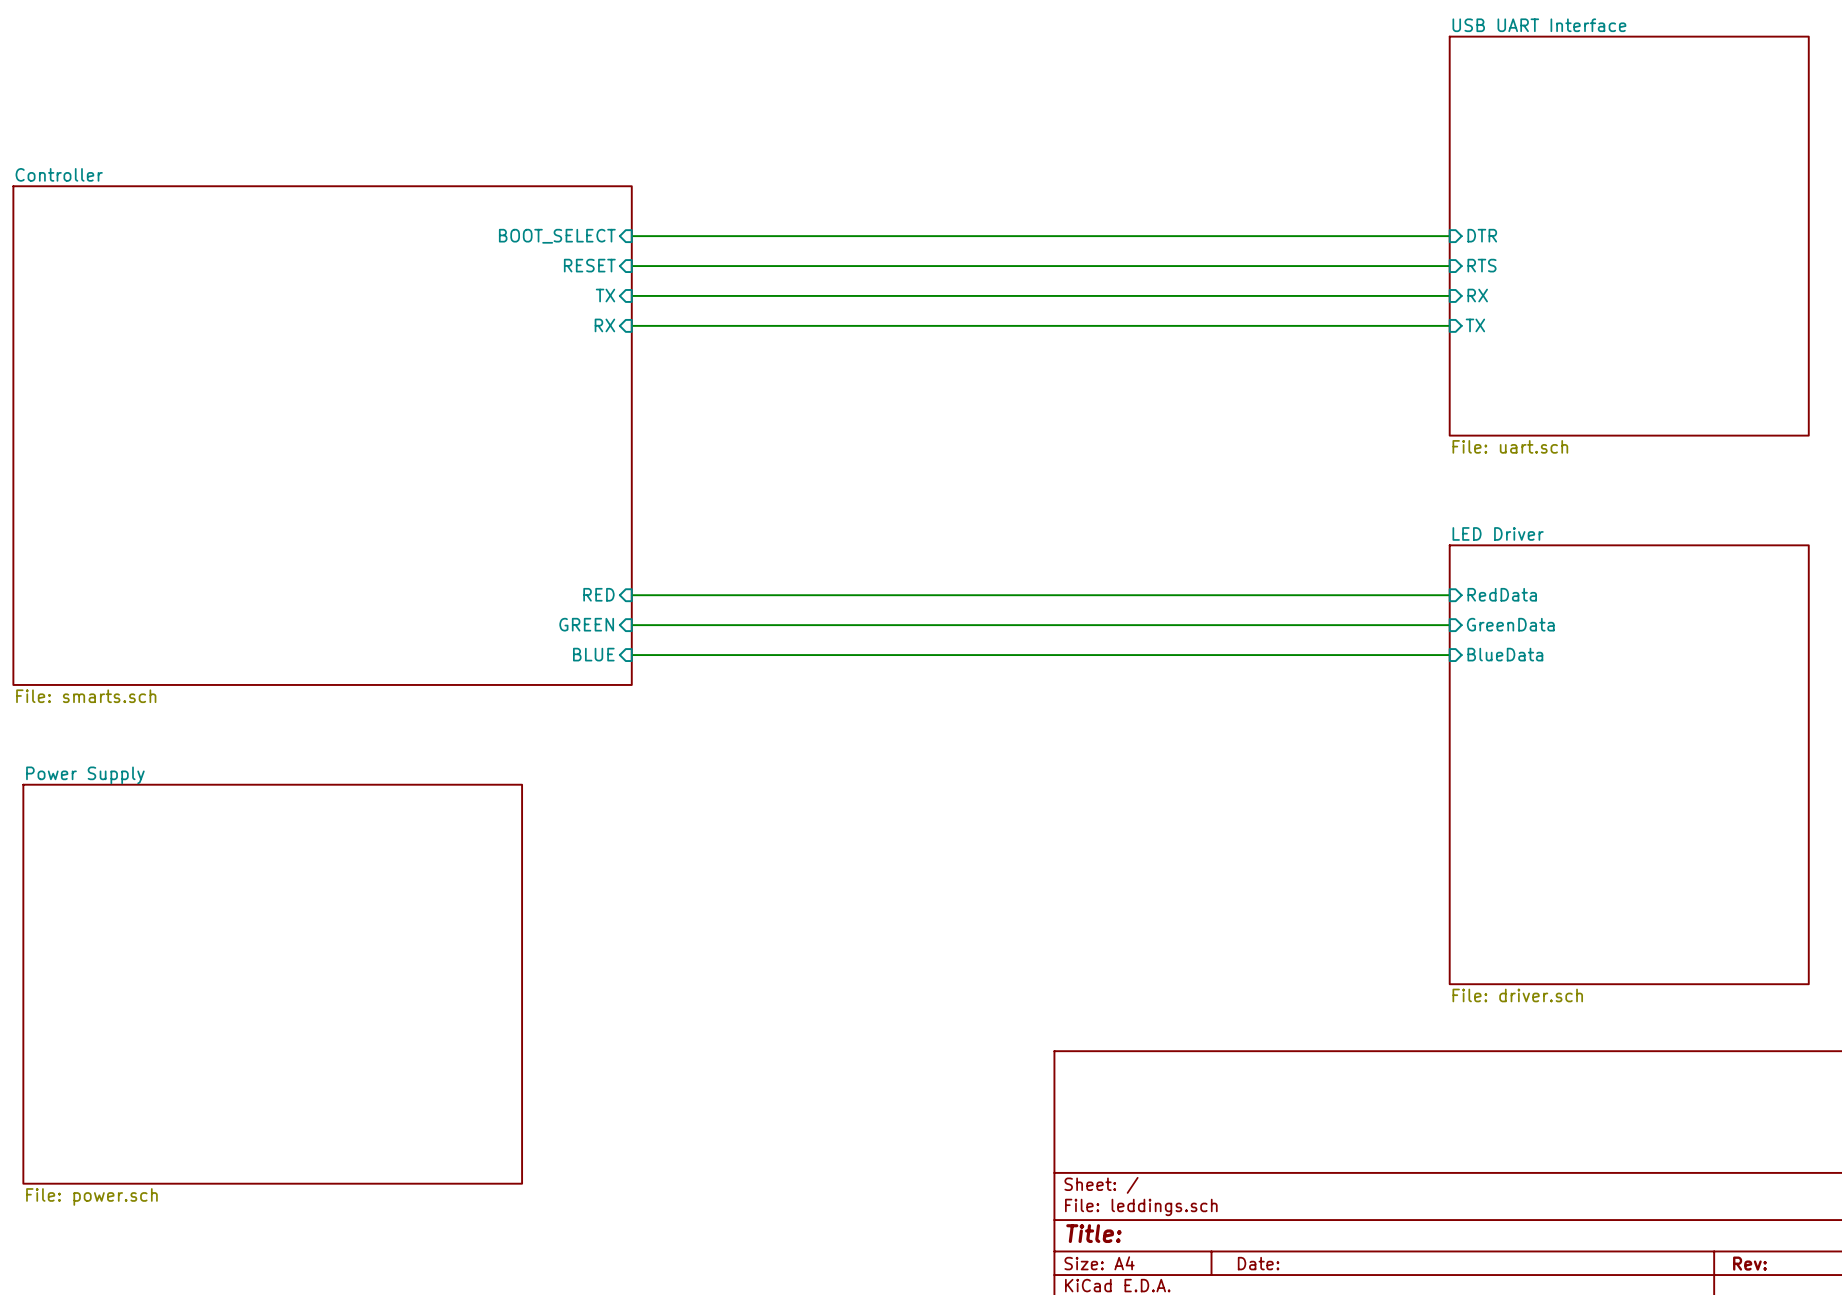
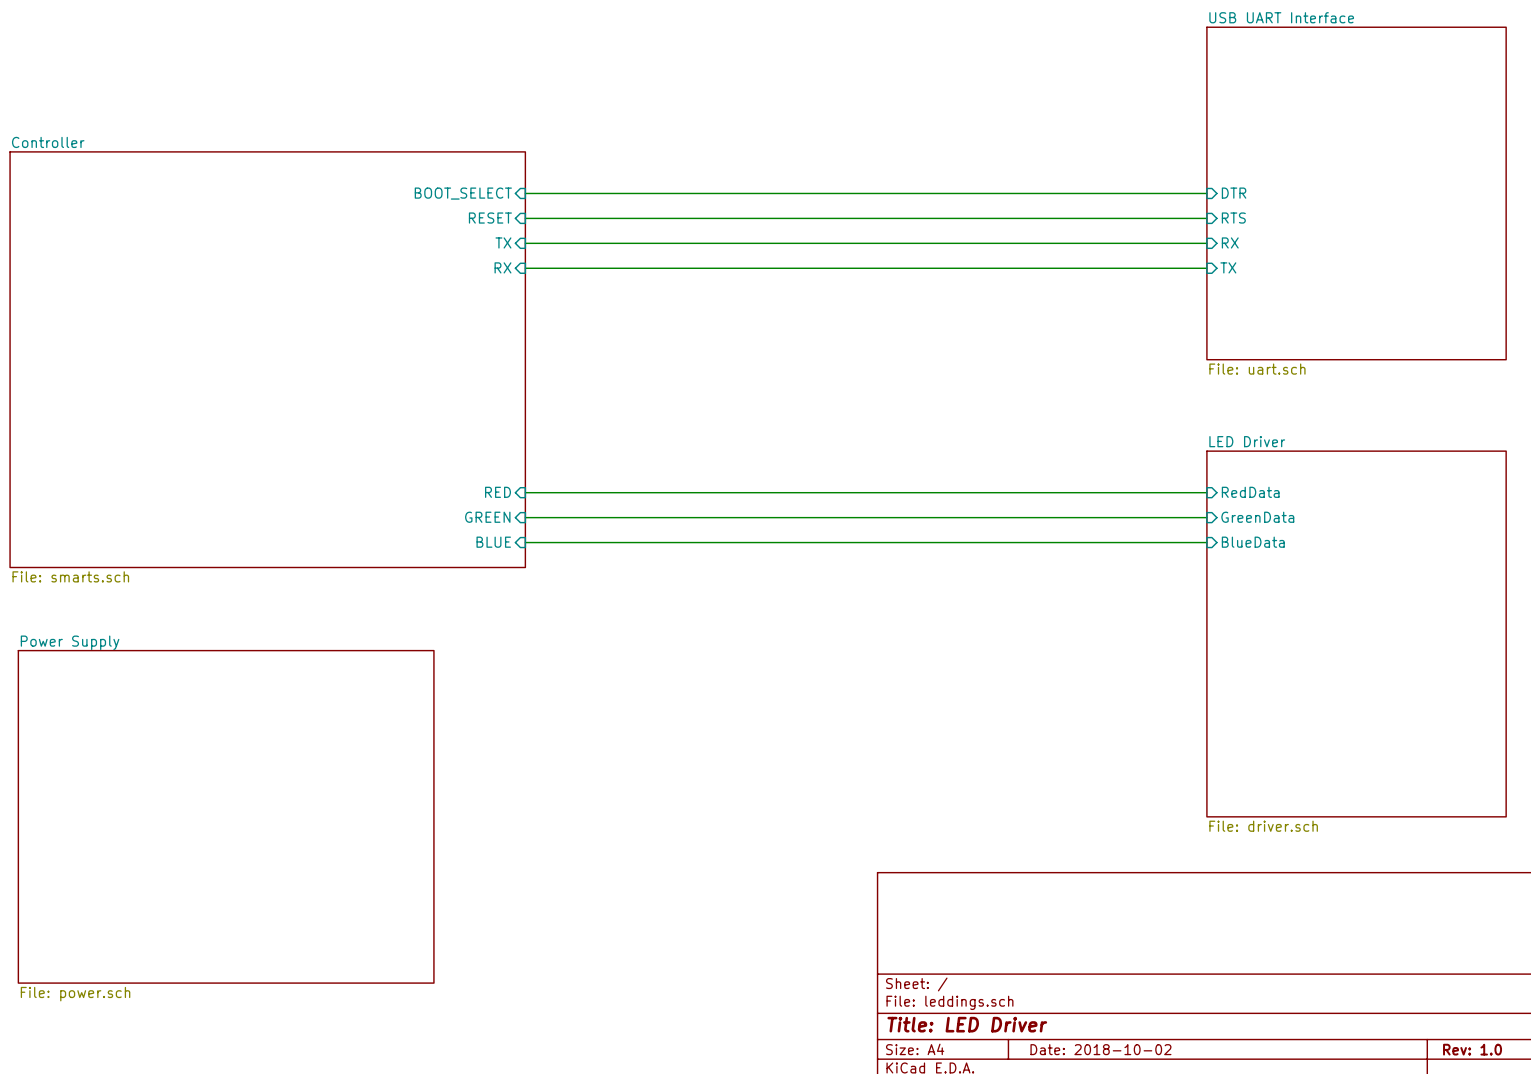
title block: Title: (1093, 1233) -> Title: LED Driver (967, 1024)
title block: Date: (1258, 1263) -> Date: 2018-10-02 (1100, 1049)
title block: Rev: (1749, 1263) -> Rev: 1.0 (1472, 1049)

